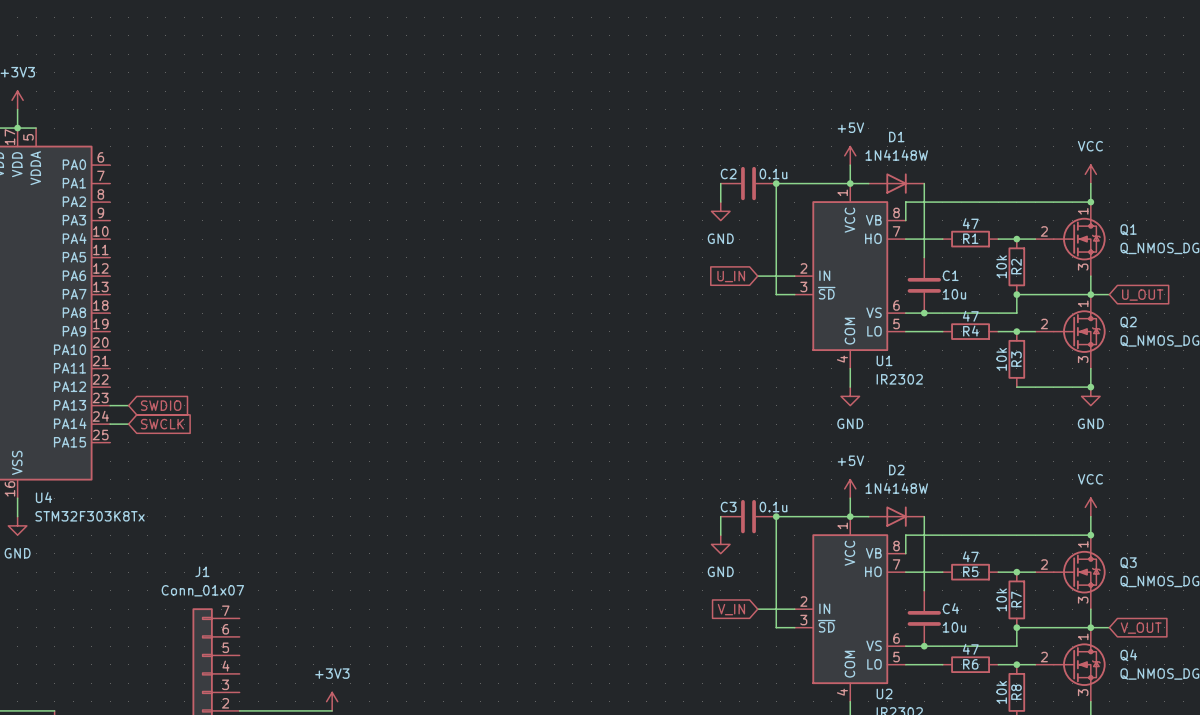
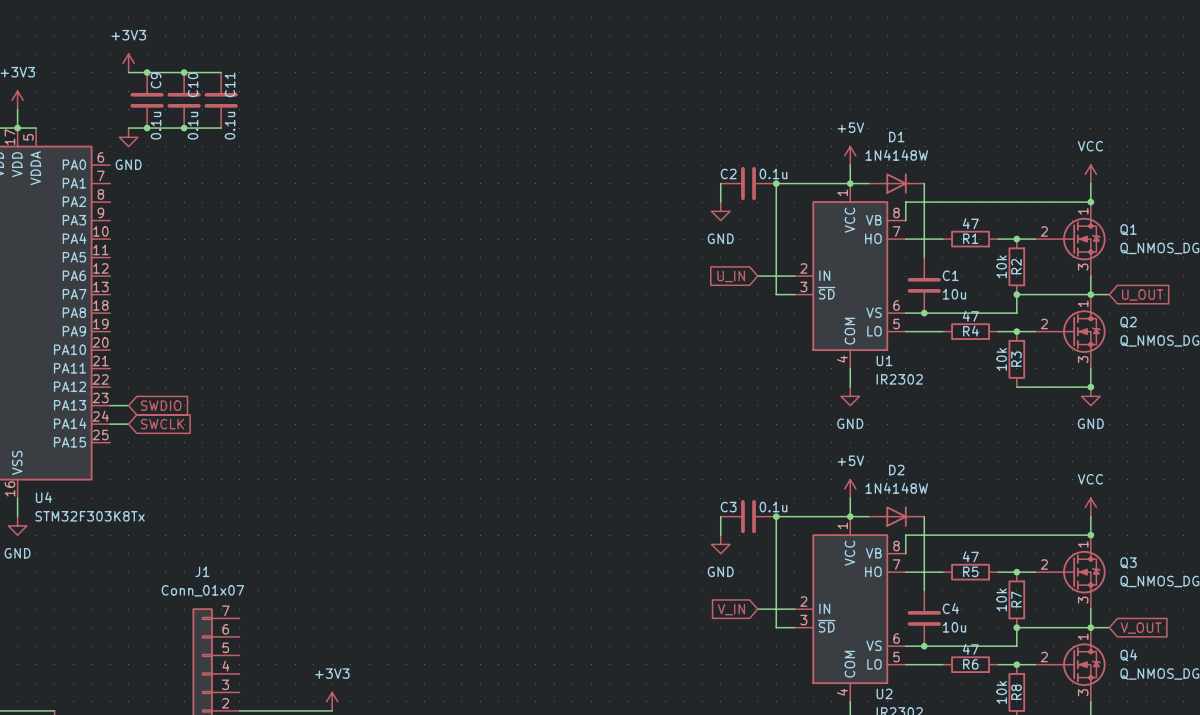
power symbol: none -> +3V3 (128, 63)
wire: none -> (128, 72) (221, 72)
junction: none -> (147, 72)
junction: none -> (184, 72)
C9: none -> 0.1u (147, 100)
C10: none -> 0.1u (184, 100)
C11: none -> 0.1u (221, 100)
wire: none -> (128, 128) (221, 128)
junction: none -> (147, 128)
junction: none -> (184, 128)
power symbol: none -> GND (128, 137)

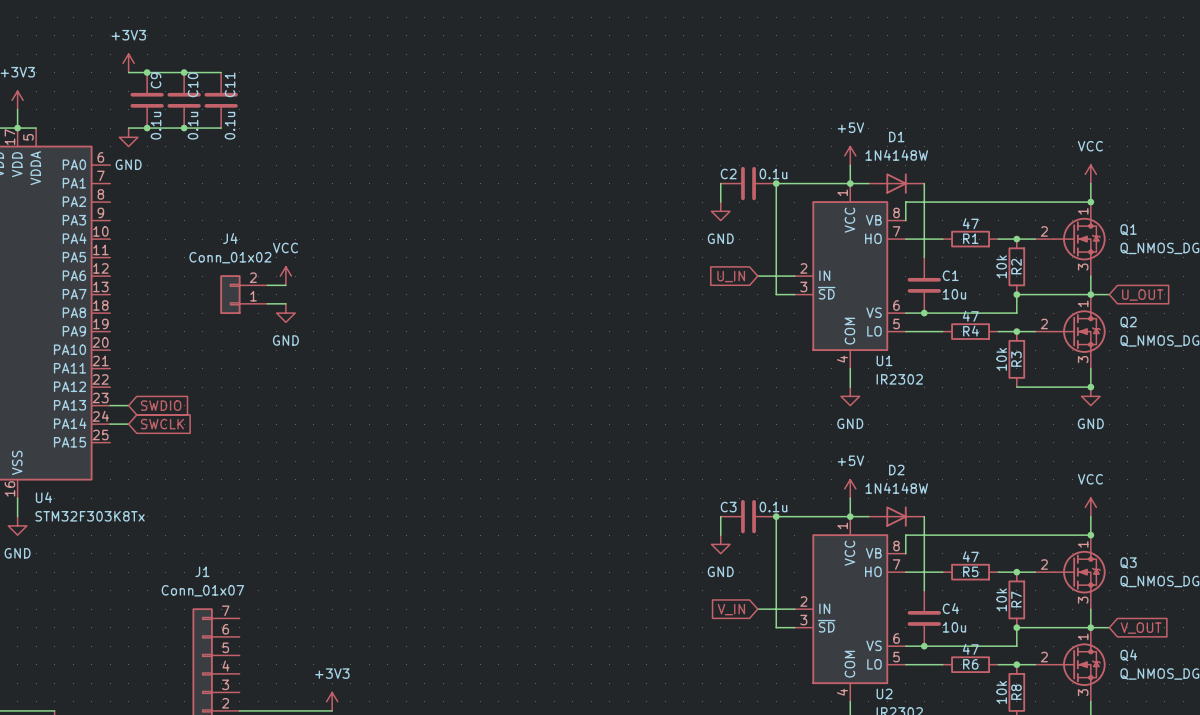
power symbol: none -> VCC (285, 276)
wire: none -> (267, 285) (285, 285)
J4: none -> Conn_01x02 (243, 294)
wire: none -> (267, 303) (285, 303)
power symbol: none -> GND (285, 313)

